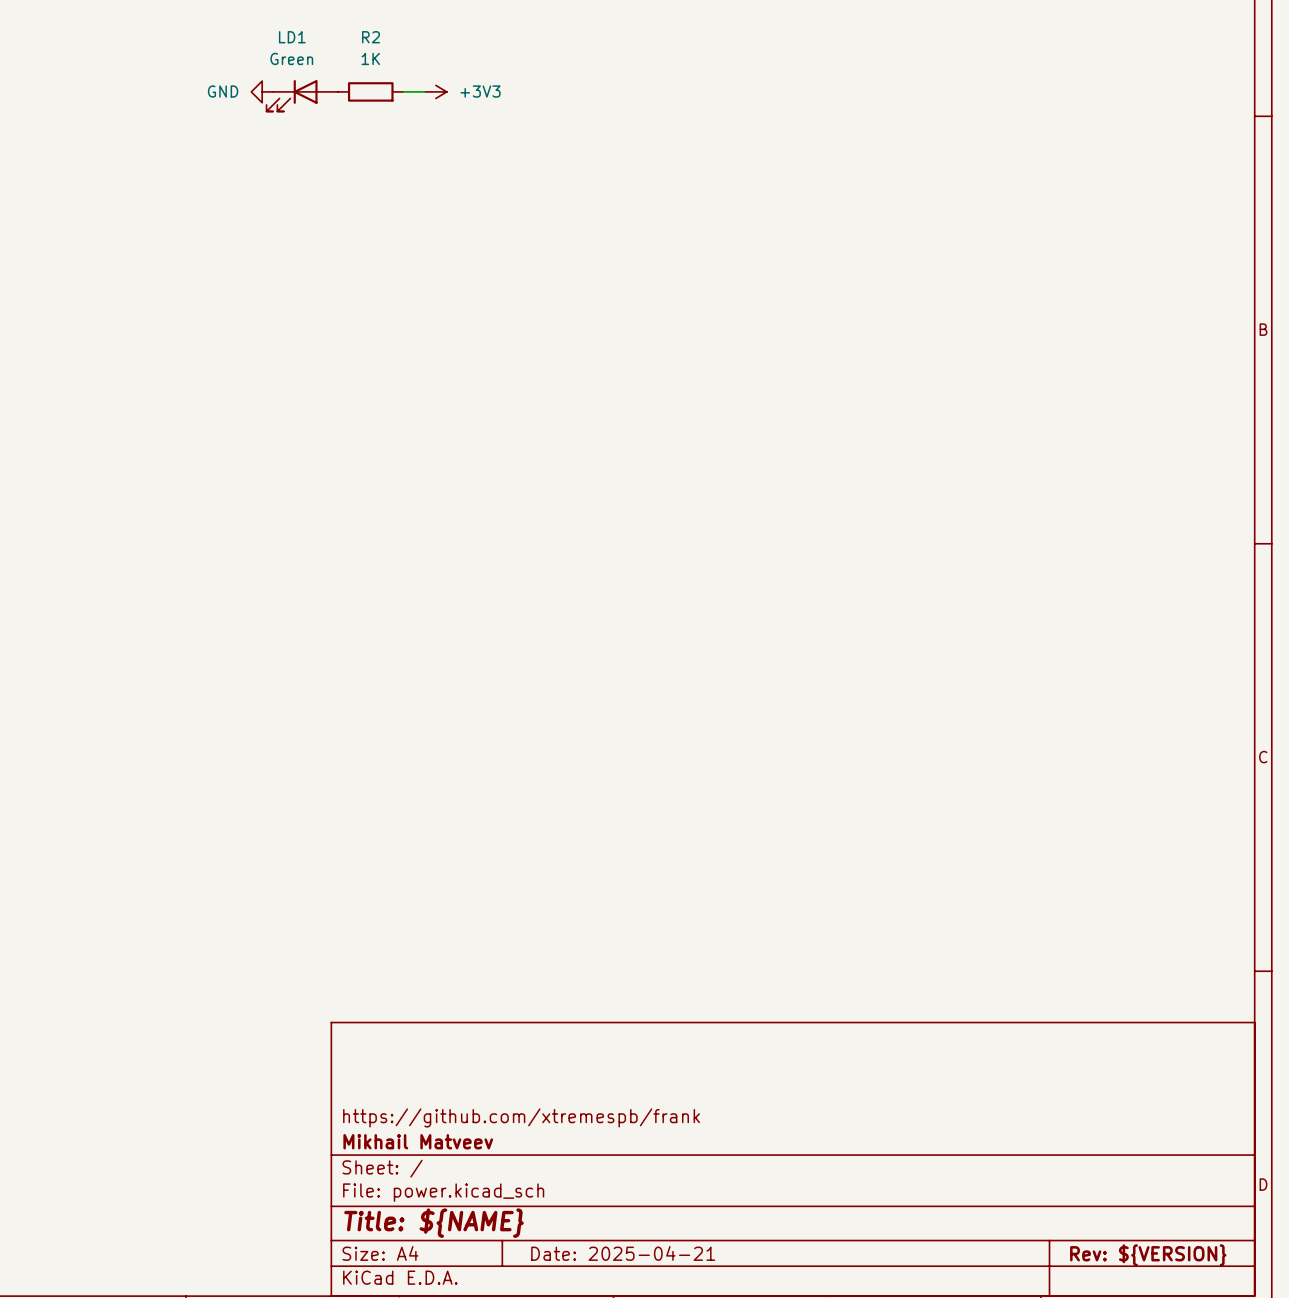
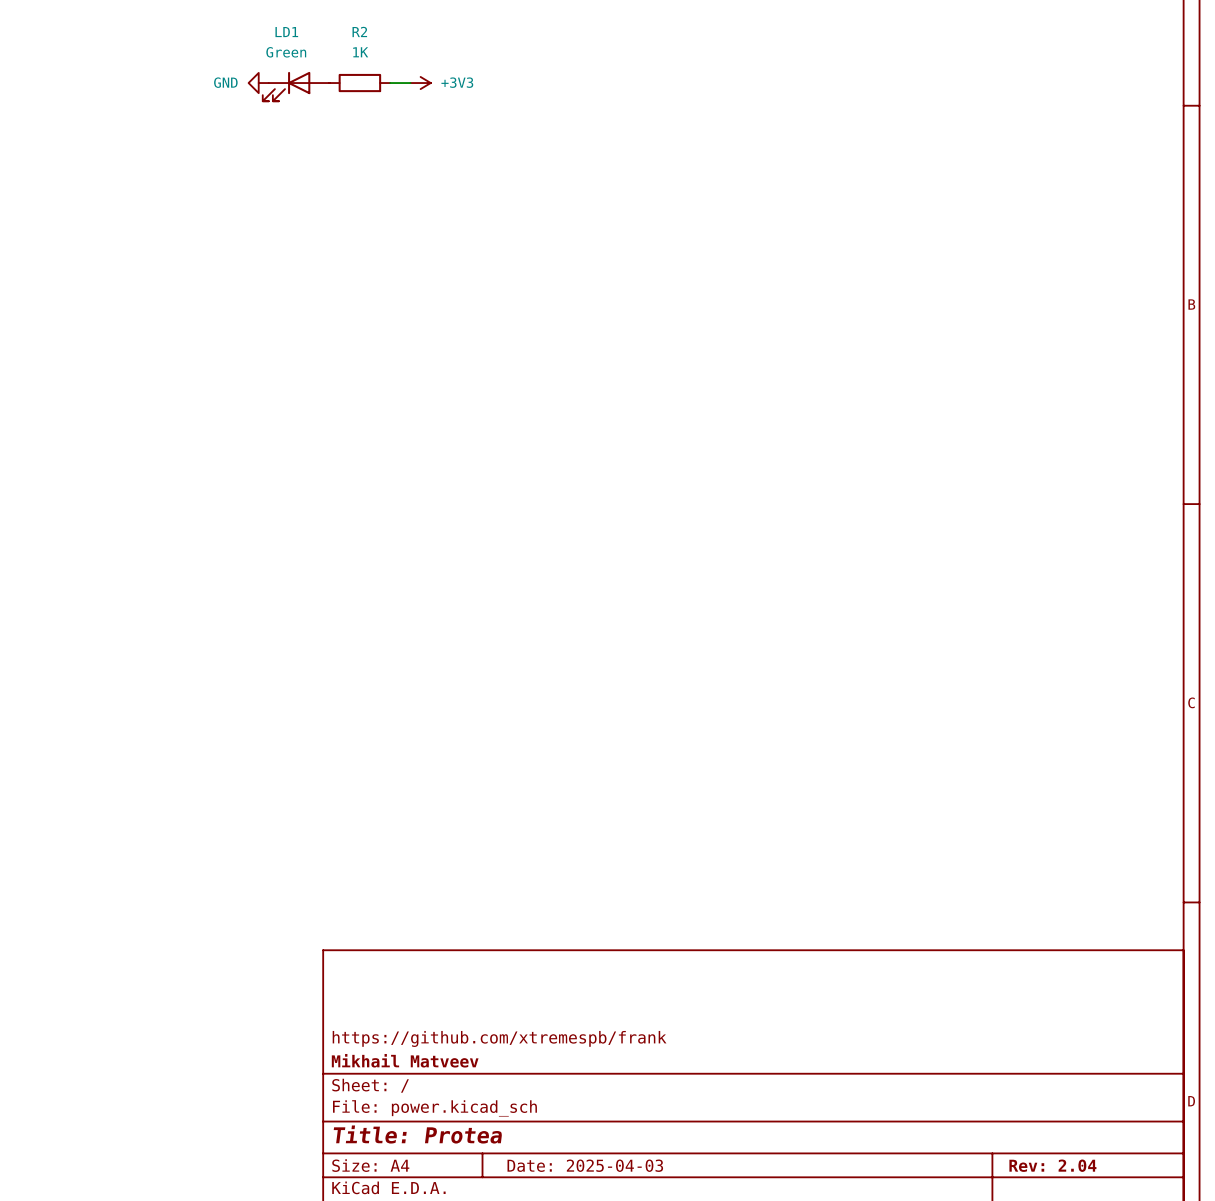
title block: Title: ${NAME} (434, 1223) -> Title: Protea (417, 1134)
title block: Date: 2025-04-21 (623, 1253) -> Date: 2025-04-03 (585, 1165)
title block: Rev: ${VERSION} (1148, 1255) -> Rev: 2.04 (1052, 1165)

